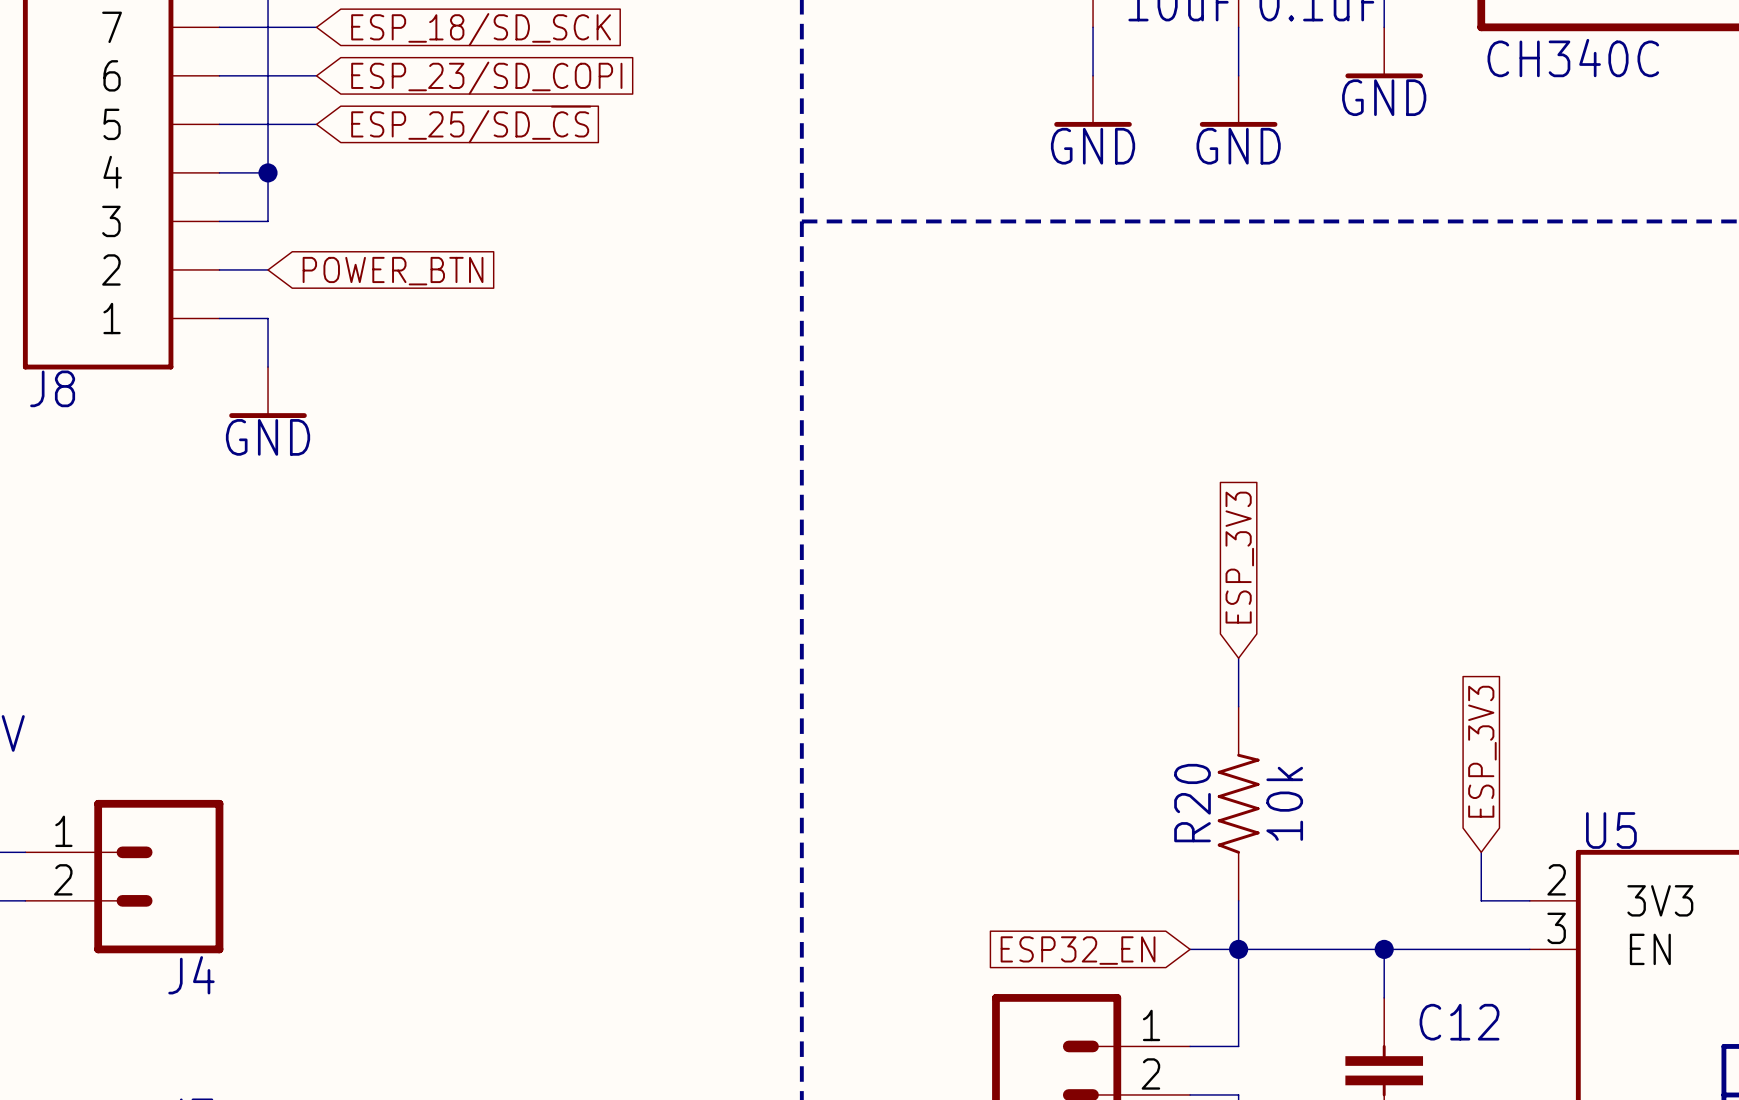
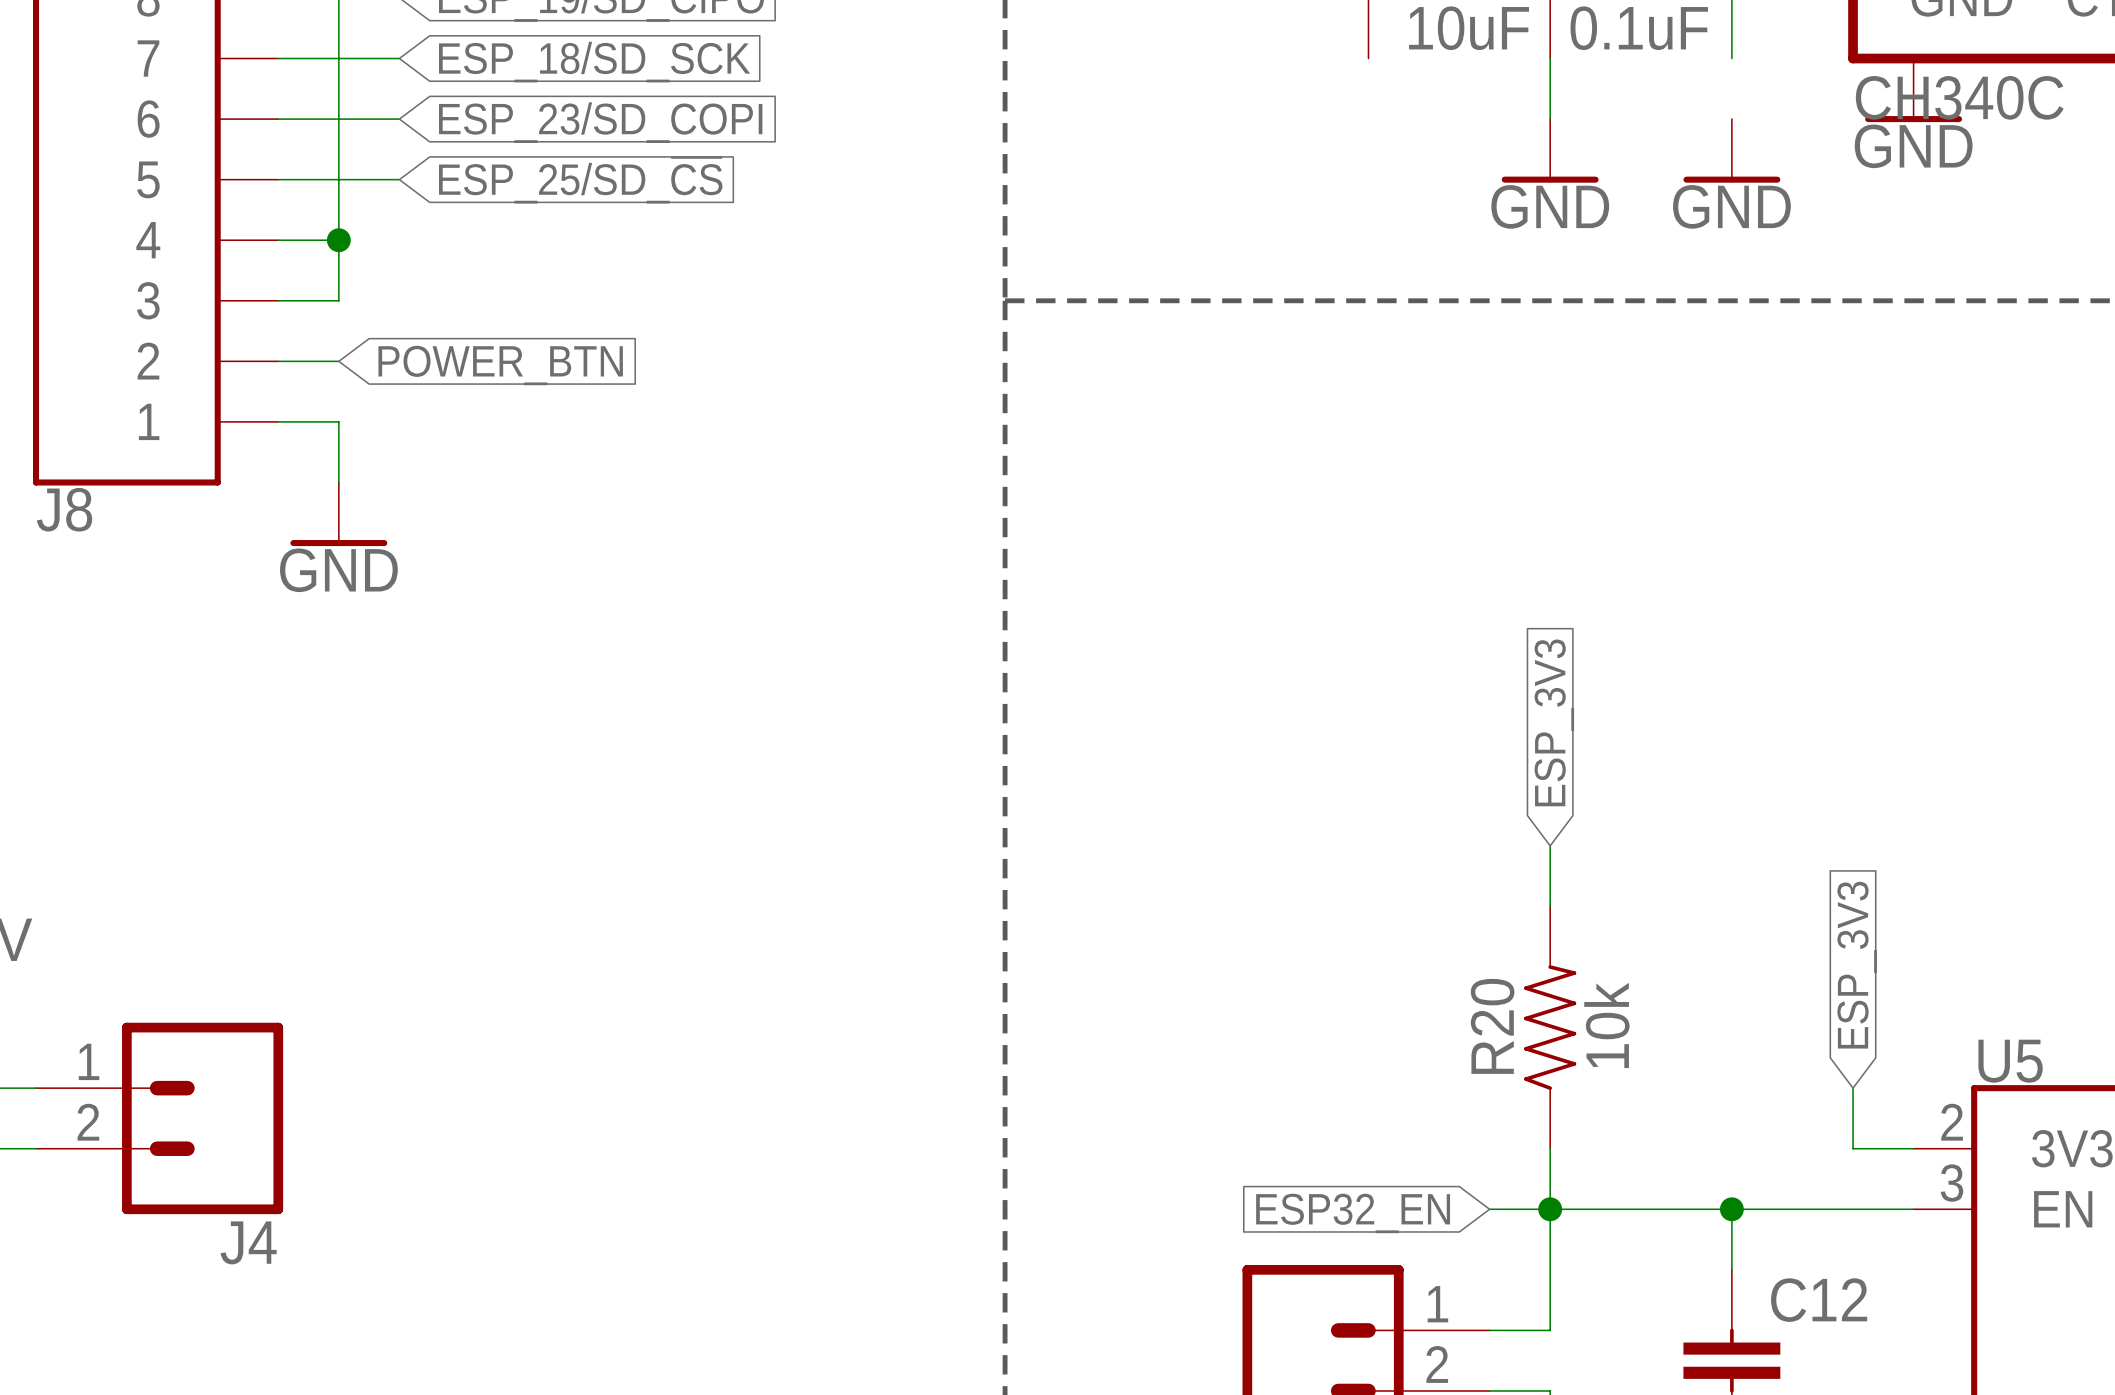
wire: (1093, 27) (1093, 75) -> none
power symbol position: GND (1384, 52) -> GND (1731, 150)
power symbol: none -> GND (1913, 90)
power symbol: GND (1093, 101) -> none

